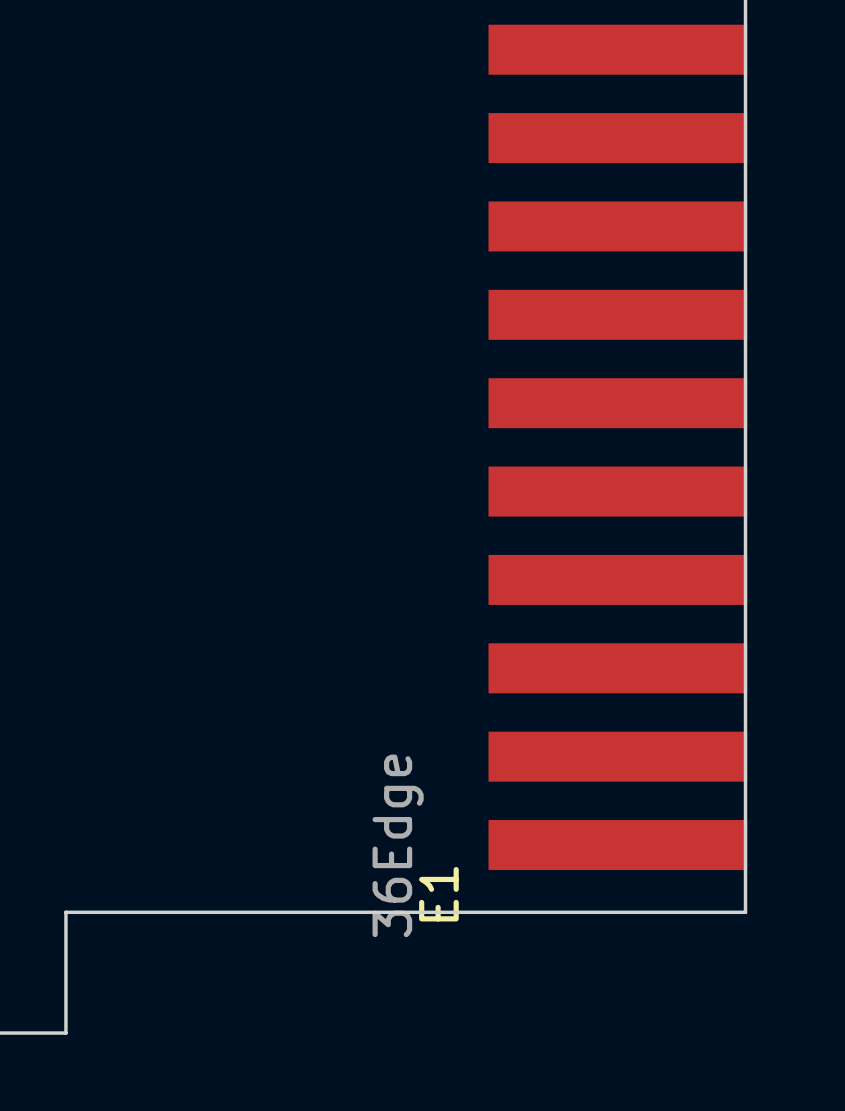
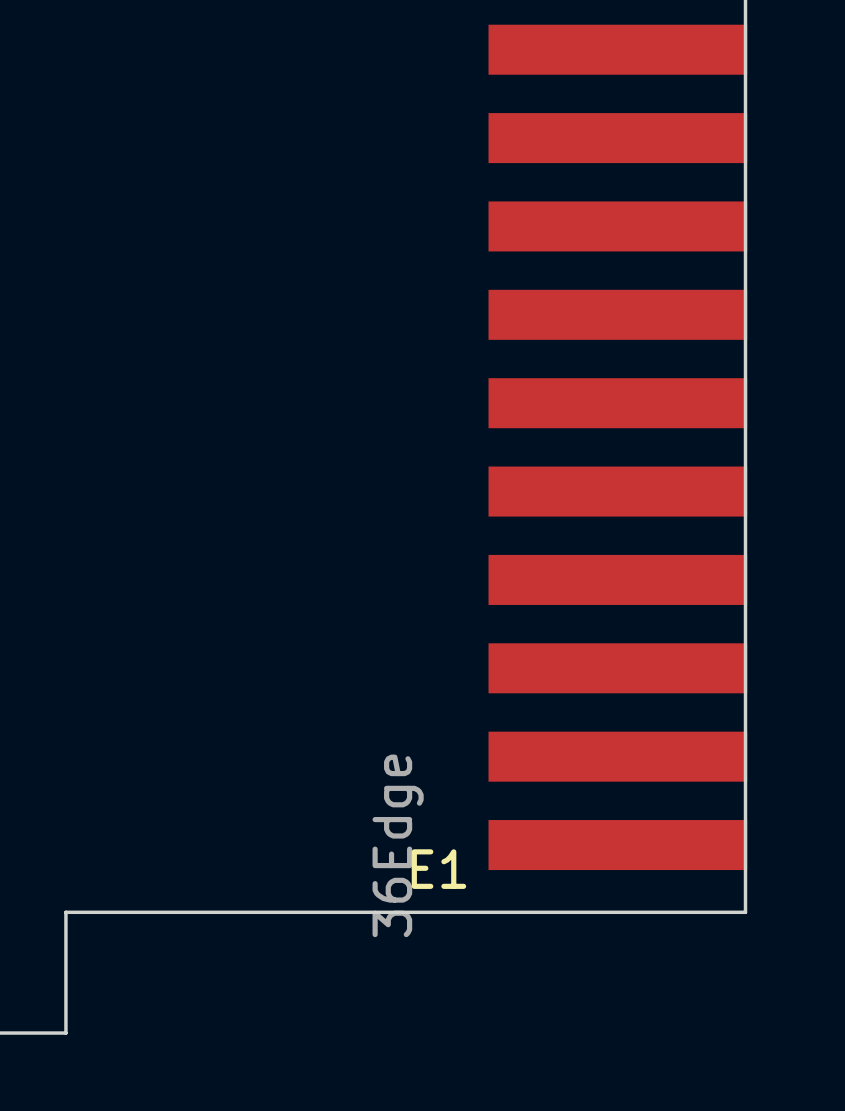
E1 name rotation: 0° (438, 894) -> 90° clockwise (438, 869)

